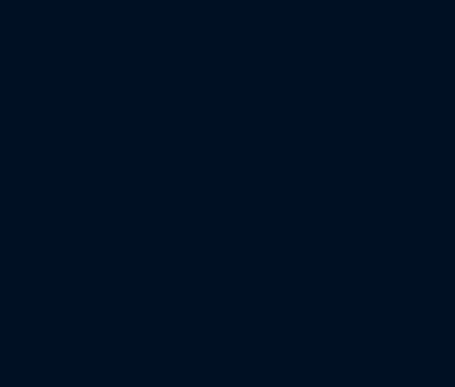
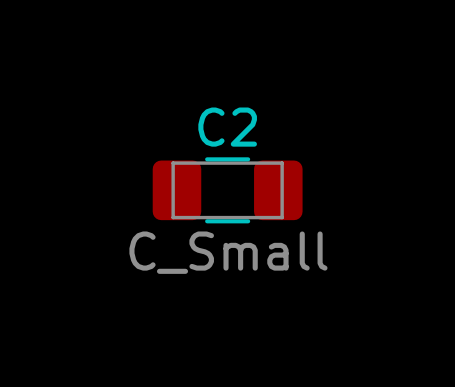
C2: none -> C_Small (227, 190)

